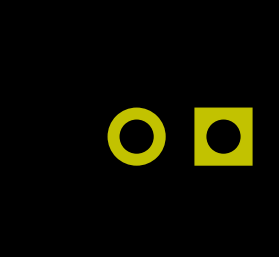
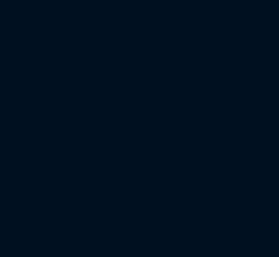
part: (180, 136) -> none

